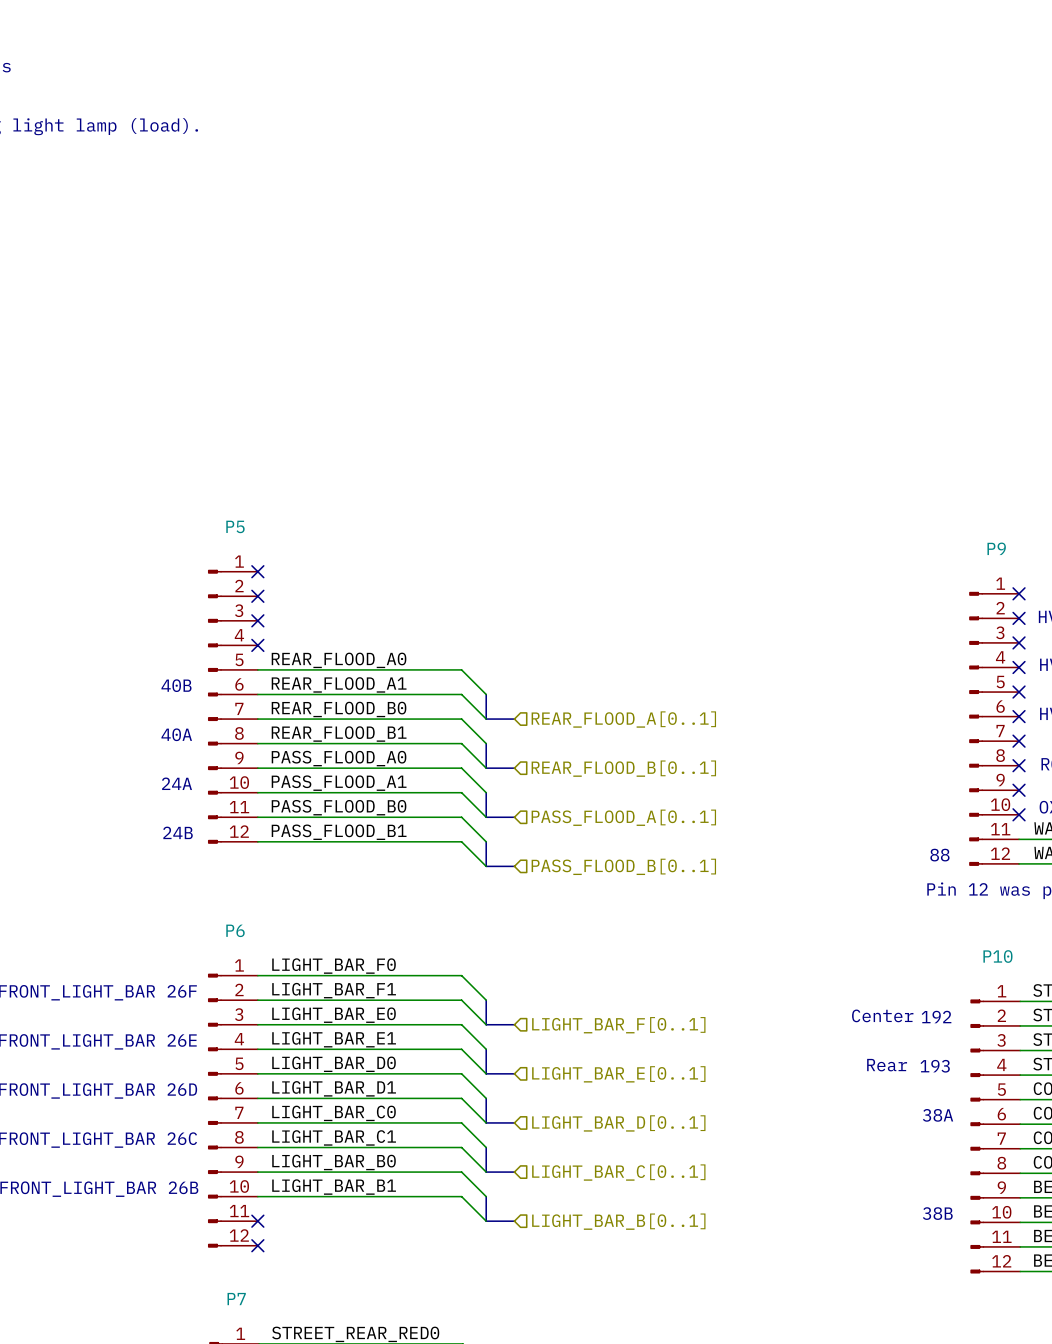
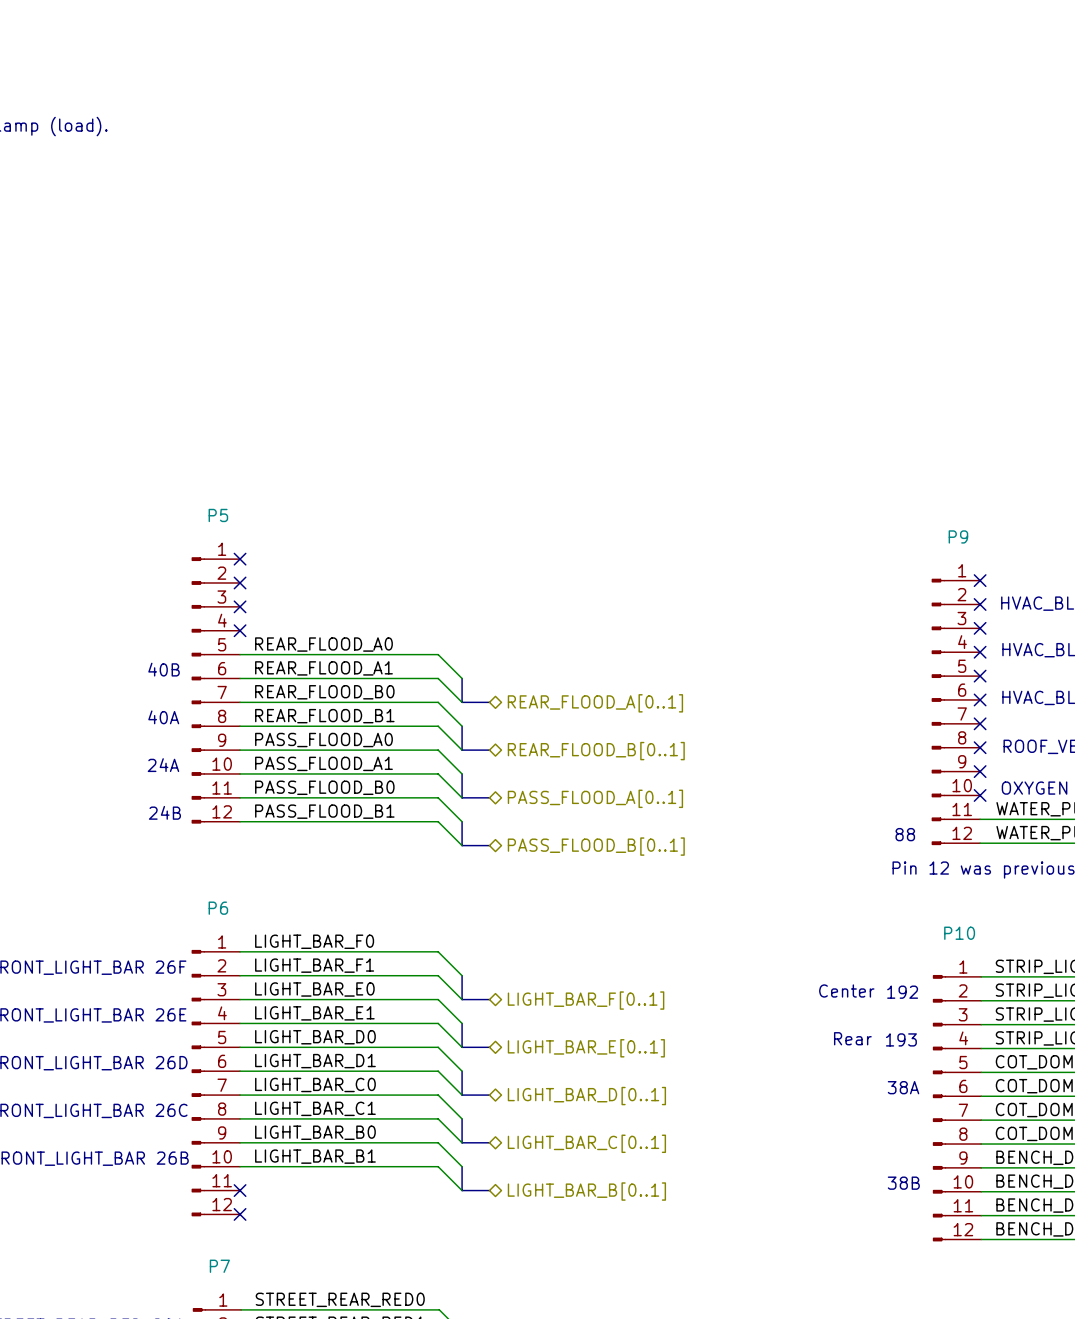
hierarchical label shape: input (623, 719) -> bidirectional (595, 703)
hierarchical label shape: input (623, 768) -> bidirectional (596, 751)
hierarchical label shape: input (623, 817) -> bidirectional (595, 798)
hierarchical label shape: input (623, 866) -> bidirectional (596, 846)
hierarchical label shape: input (618, 1025) -> bidirectional (586, 1000)
hierarchical label shape: input (618, 1074) -> bidirectional (586, 1048)
hierarchical label shape: input (618, 1123) -> bidirectional (586, 1096)
hierarchical label shape: input (618, 1172) -> bidirectional (586, 1143)
hierarchical label shape: input (618, 1221) -> bidirectional (586, 1191)

